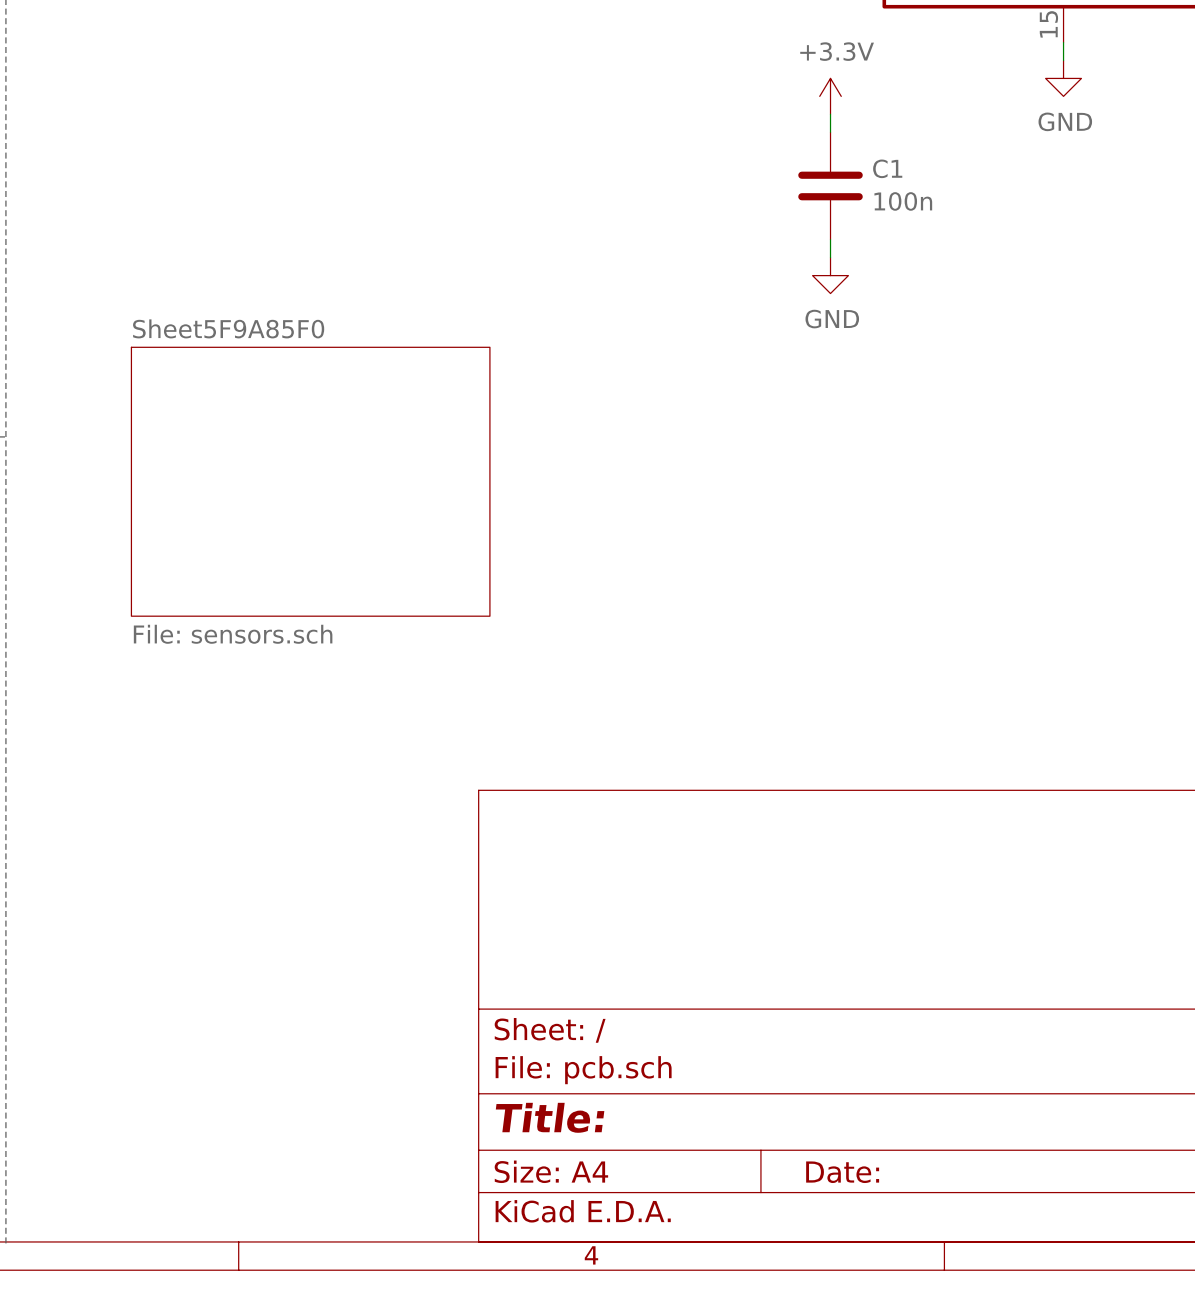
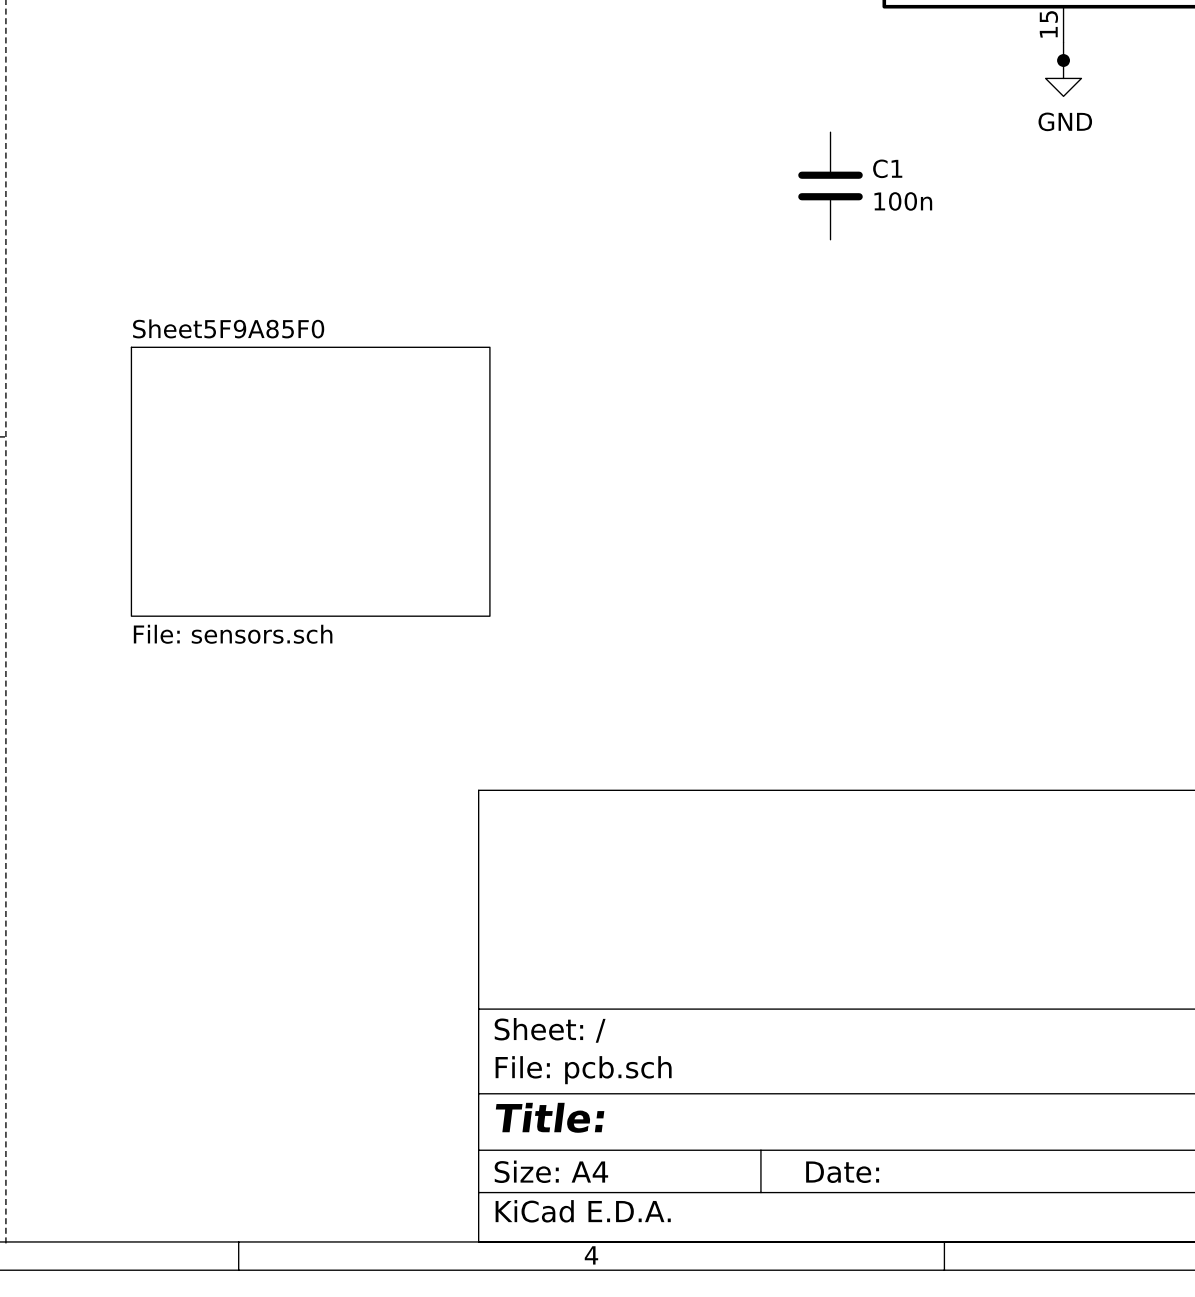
junction: none -> (1063, 60)
power symbol: +3.3V (830, 96) -> none
wire: (830, 114) (830, 132) -> none
wire: (830, 239) (830, 257) -> none
power symbol: GND (830, 275) -> none

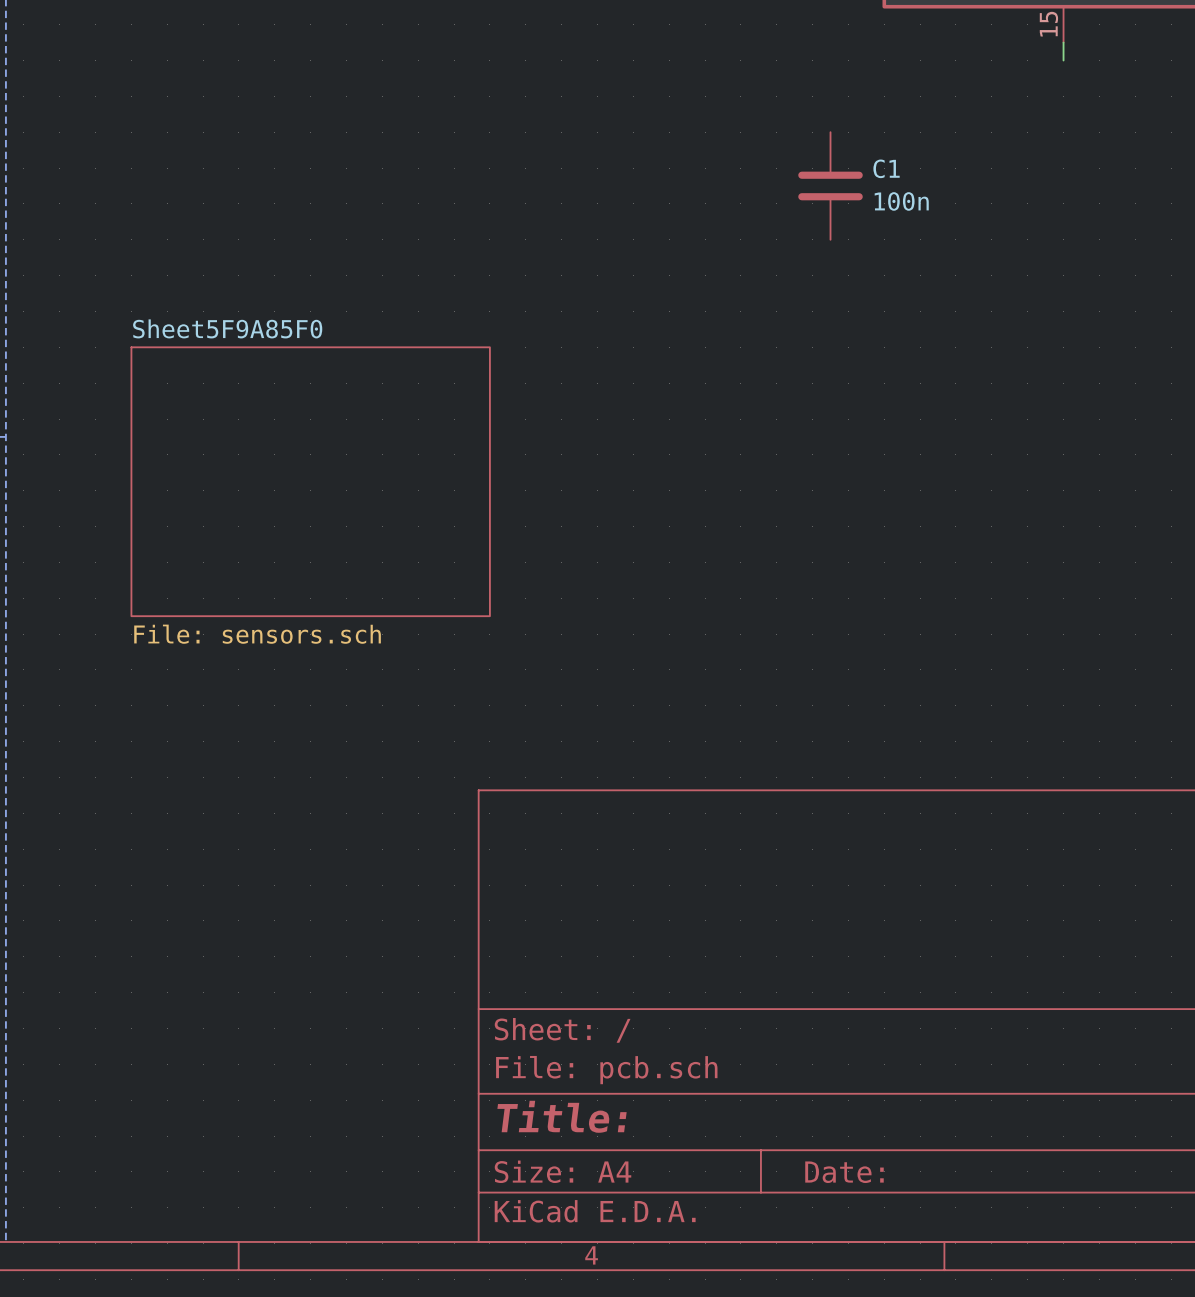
junction: (1063, 60) -> none
power symbol: GND (1063, 78) -> none

